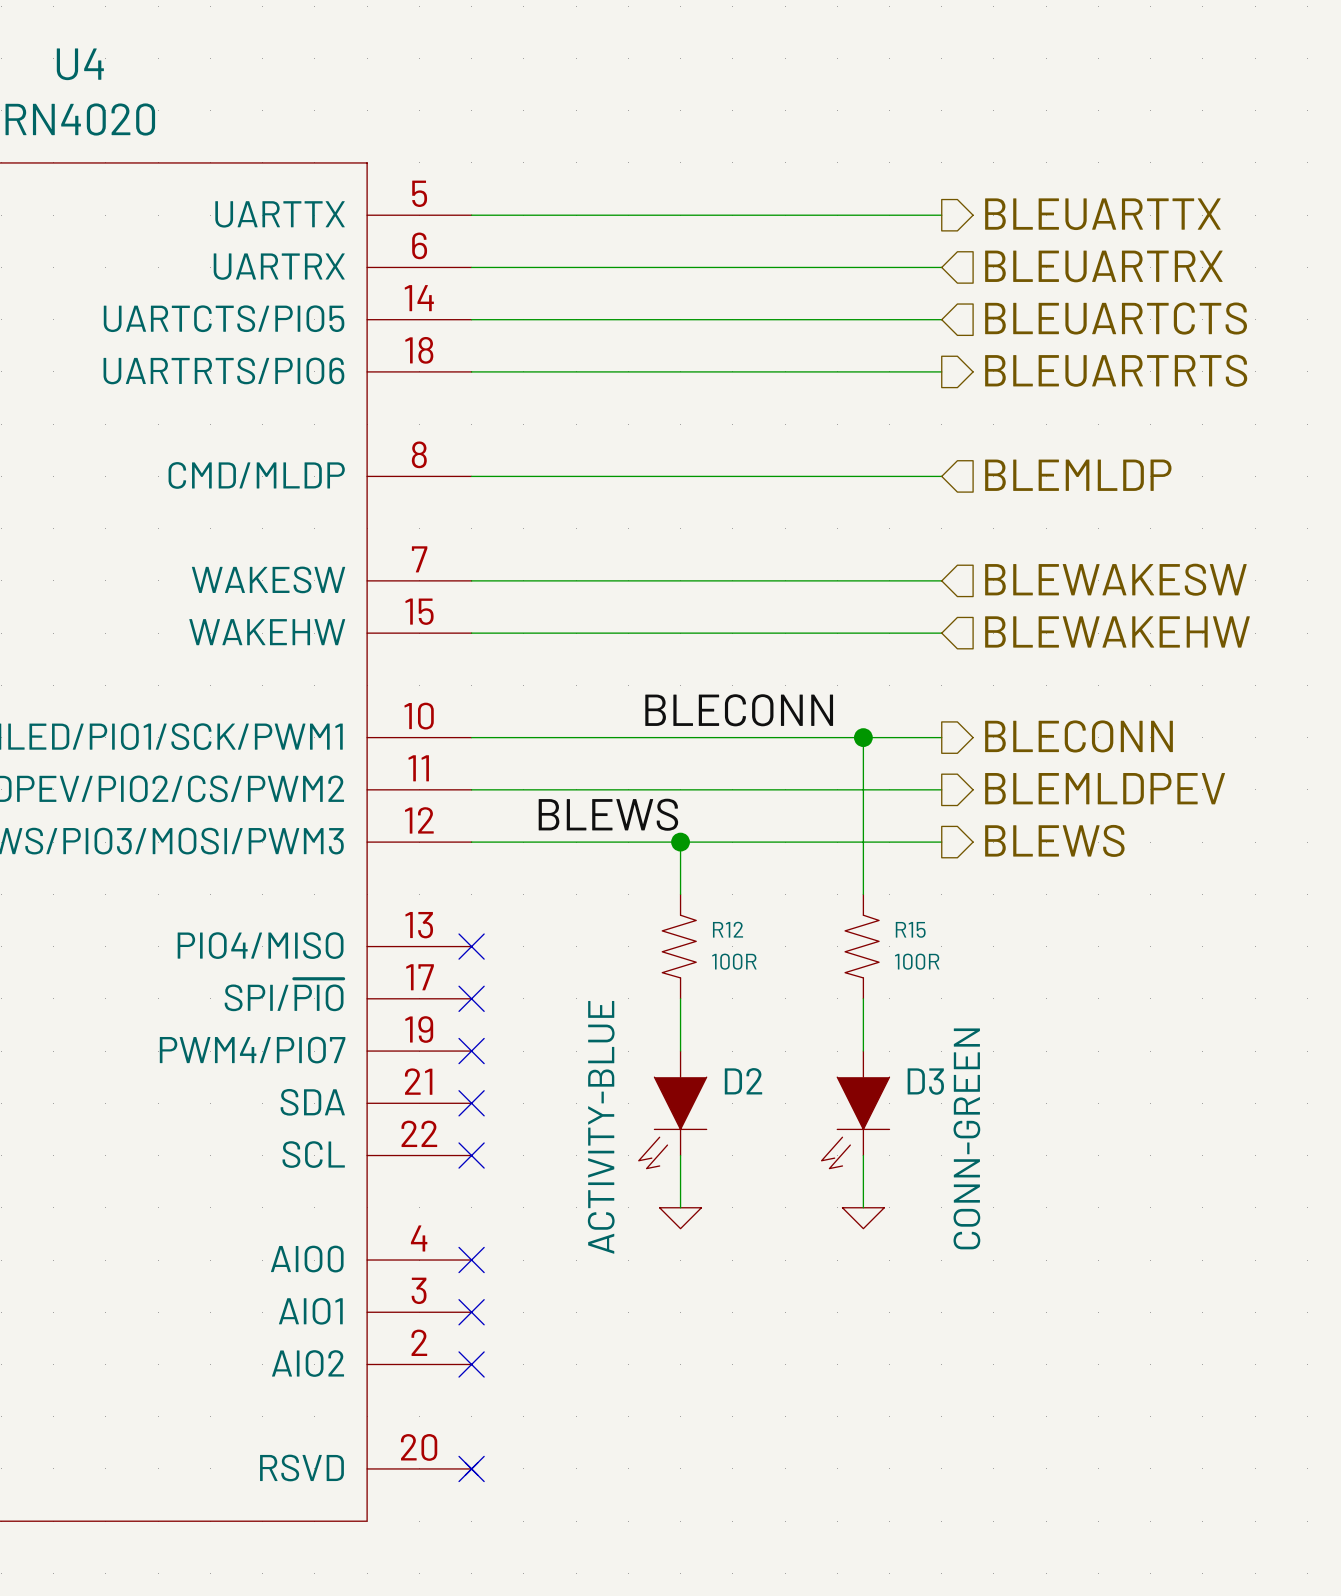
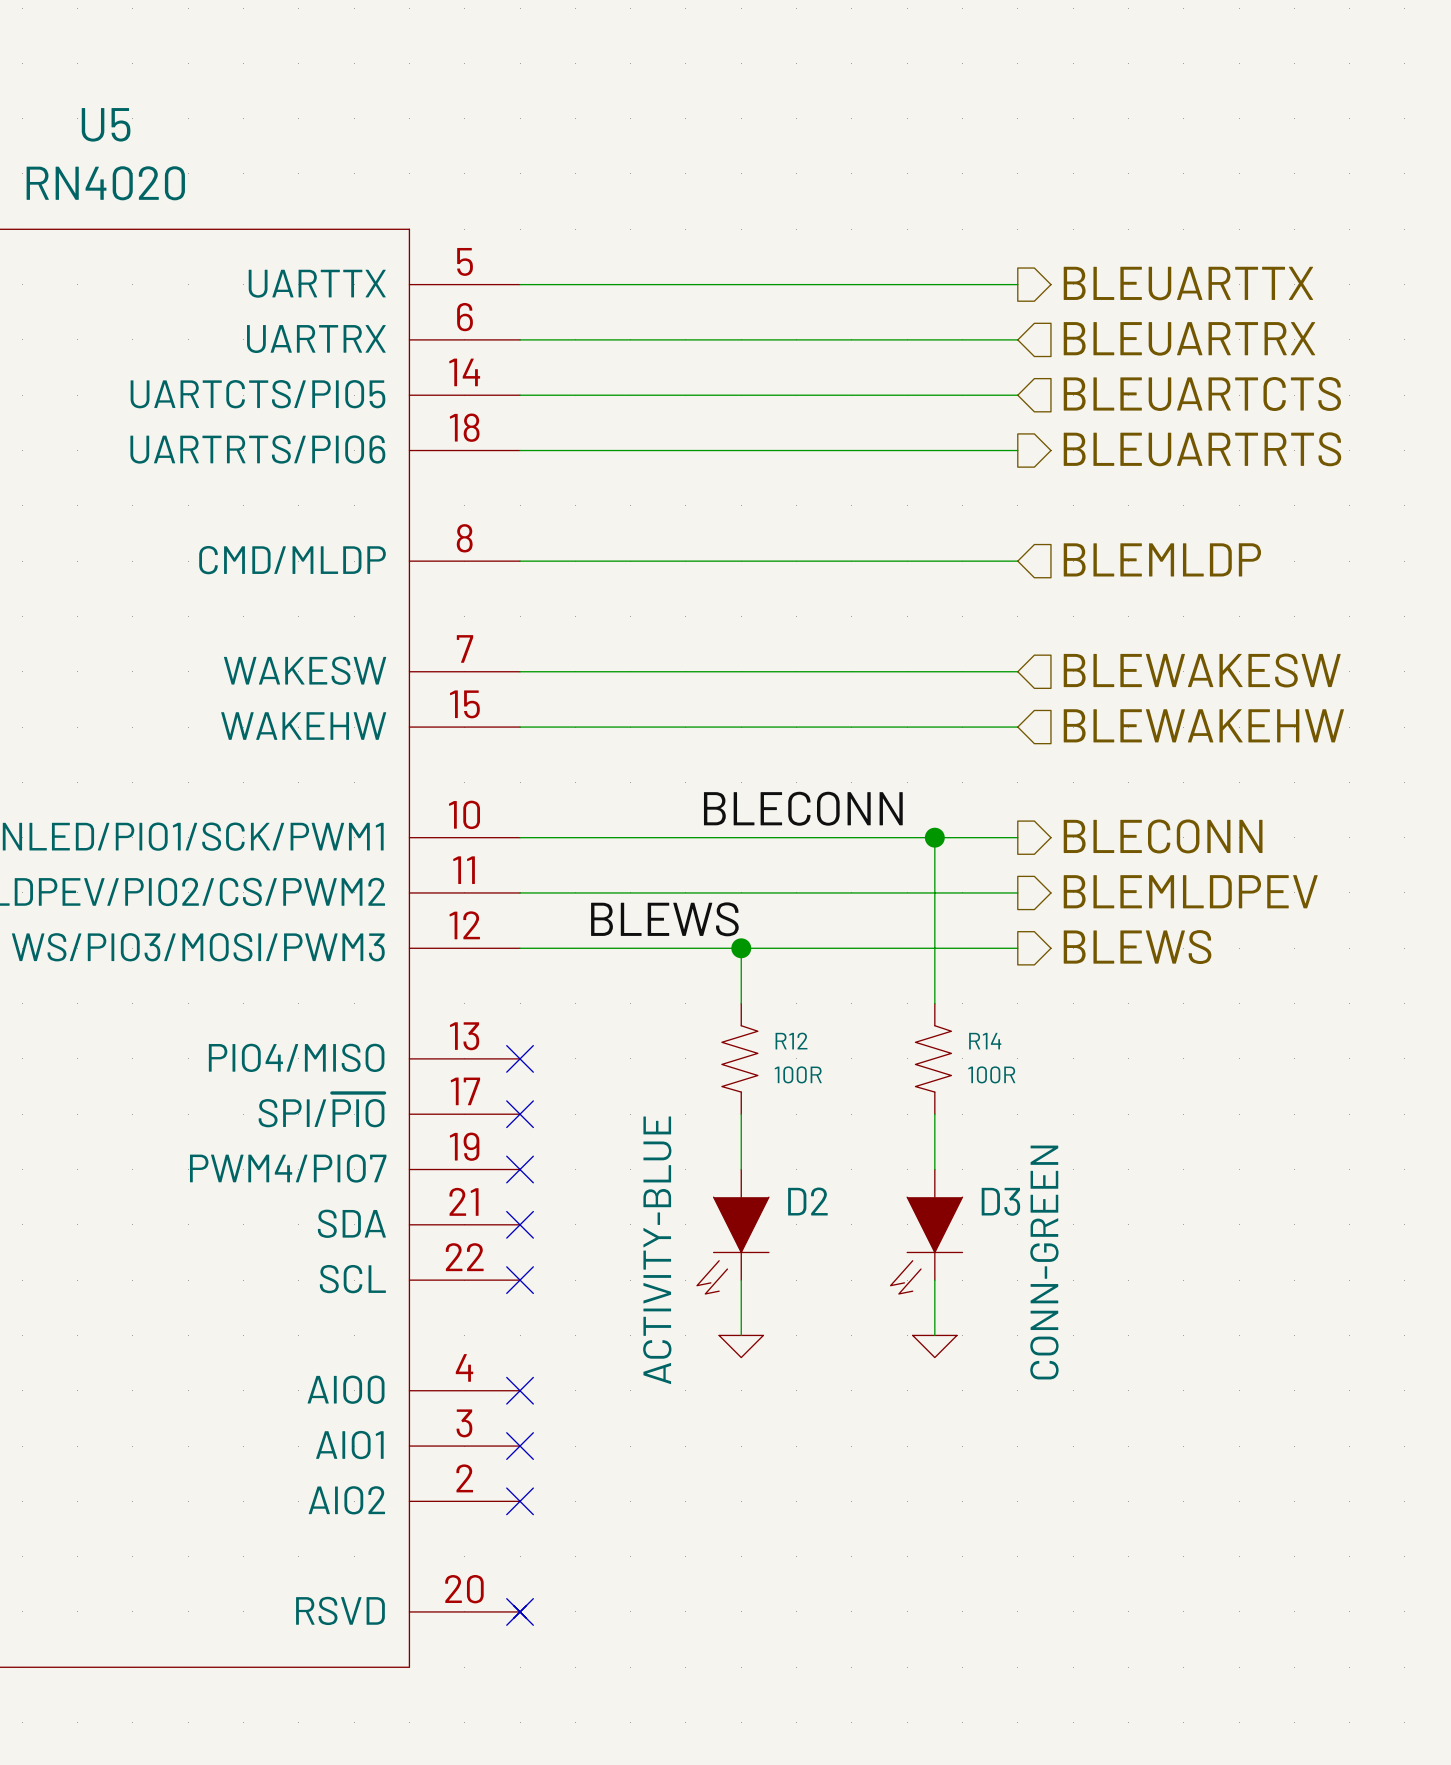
U4 name: U4 (80, 64) -> U5 (106, 124)
R15 name: R15 (910, 929) -> R14 (985, 1041)

